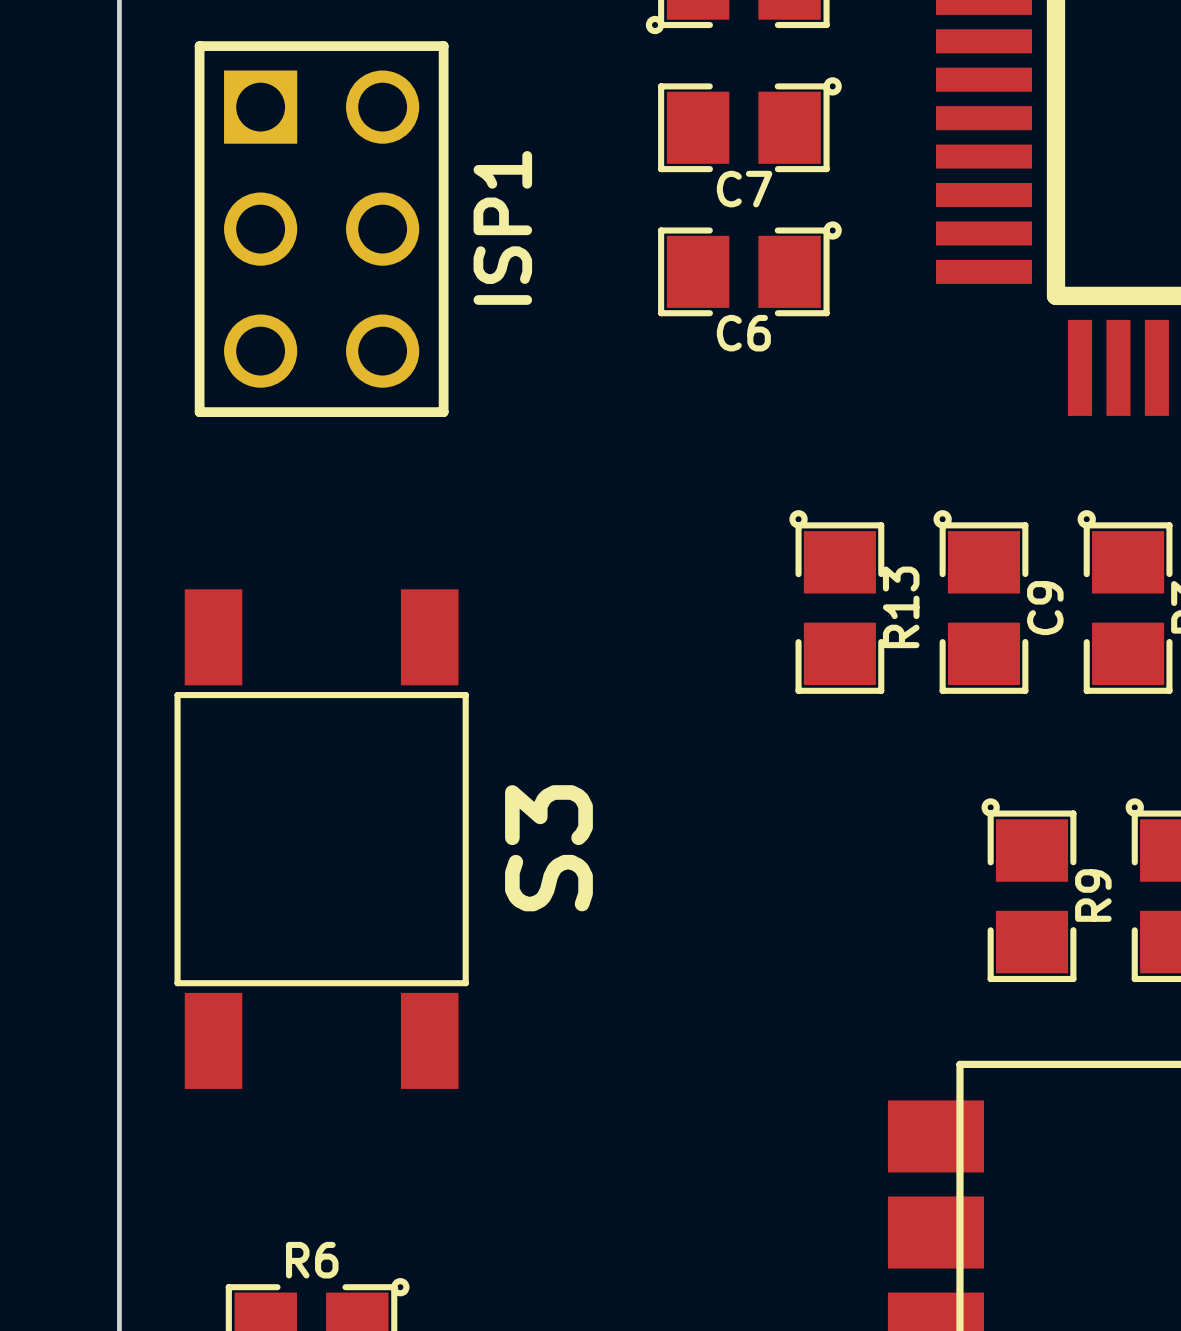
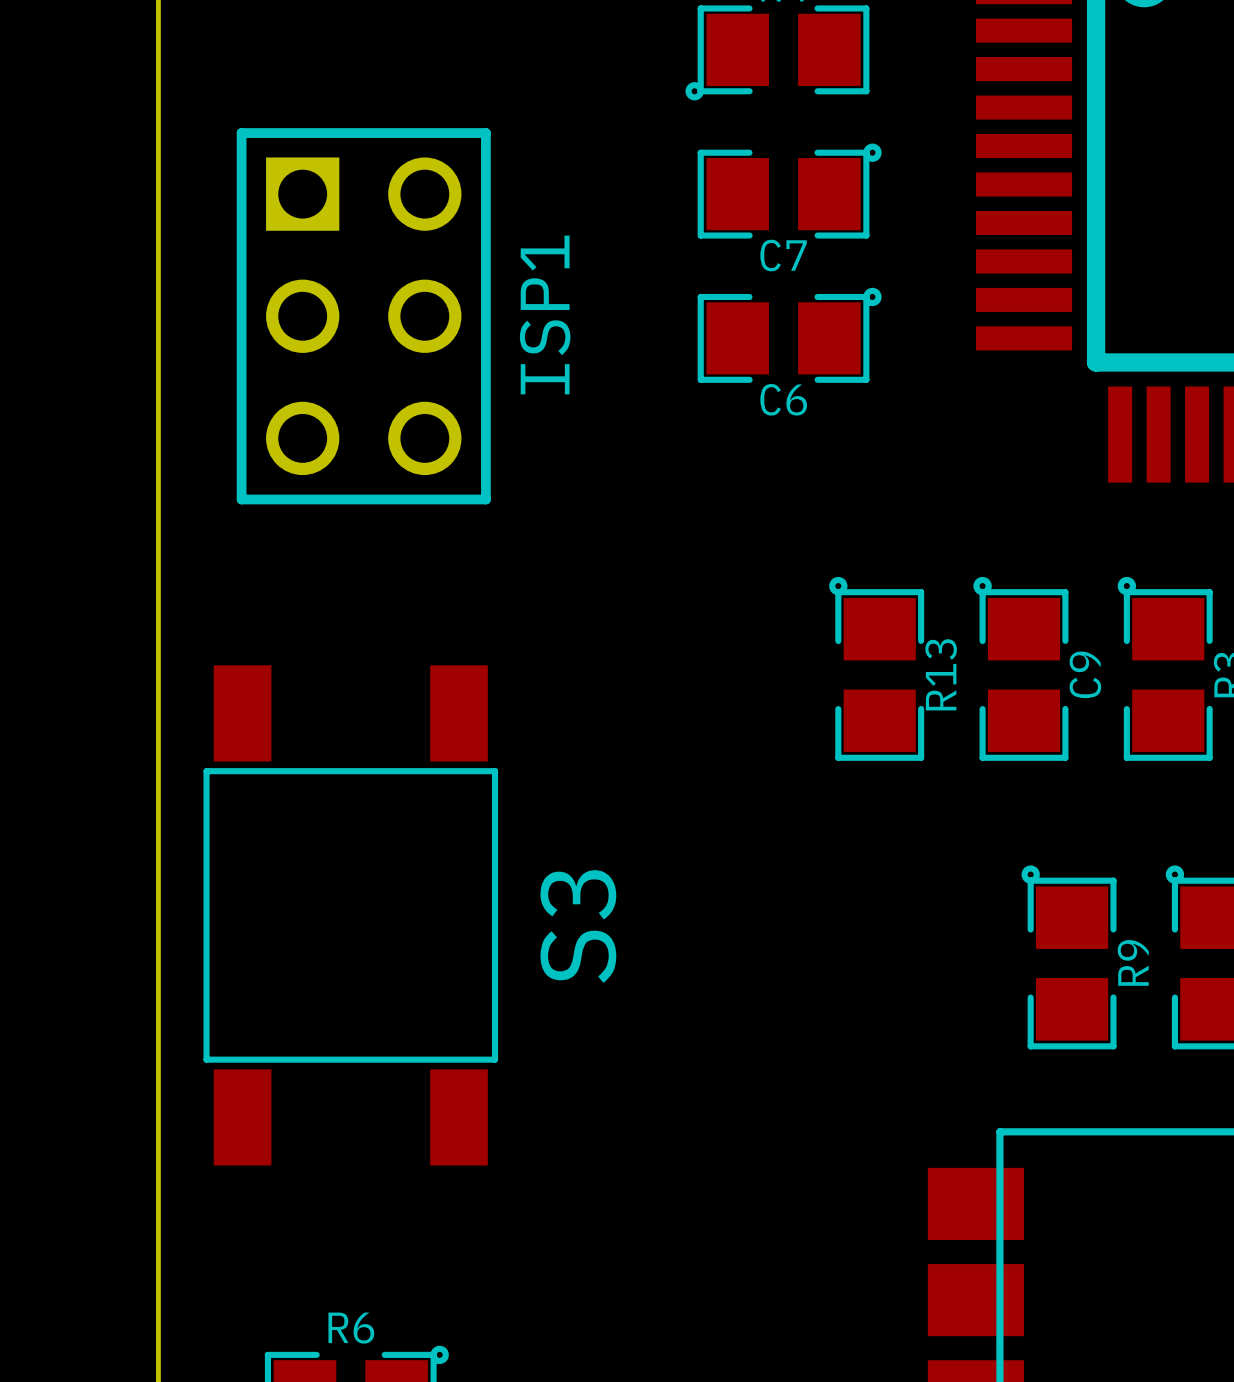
ISP1 position: (321, 229) -> (363, 316)
S3 position: (321, 839) -> (350, 915)

